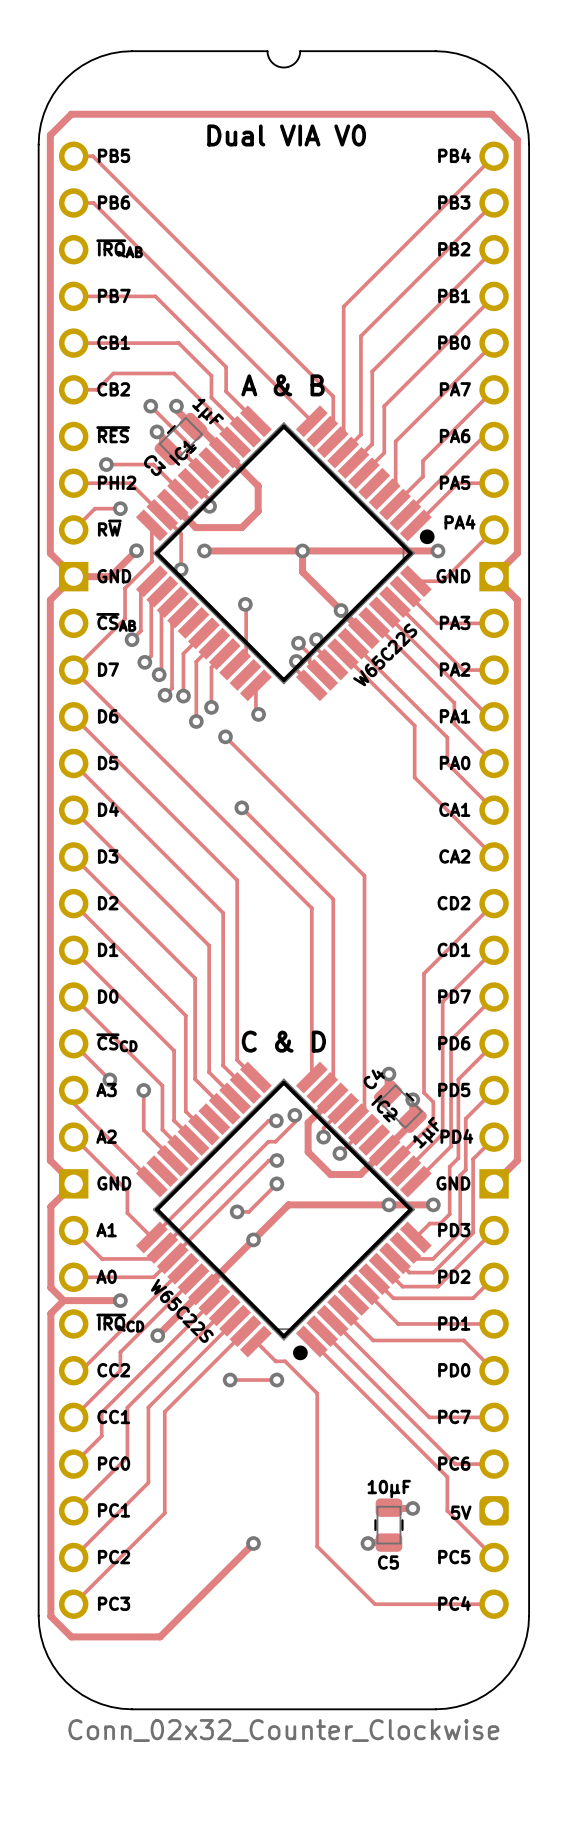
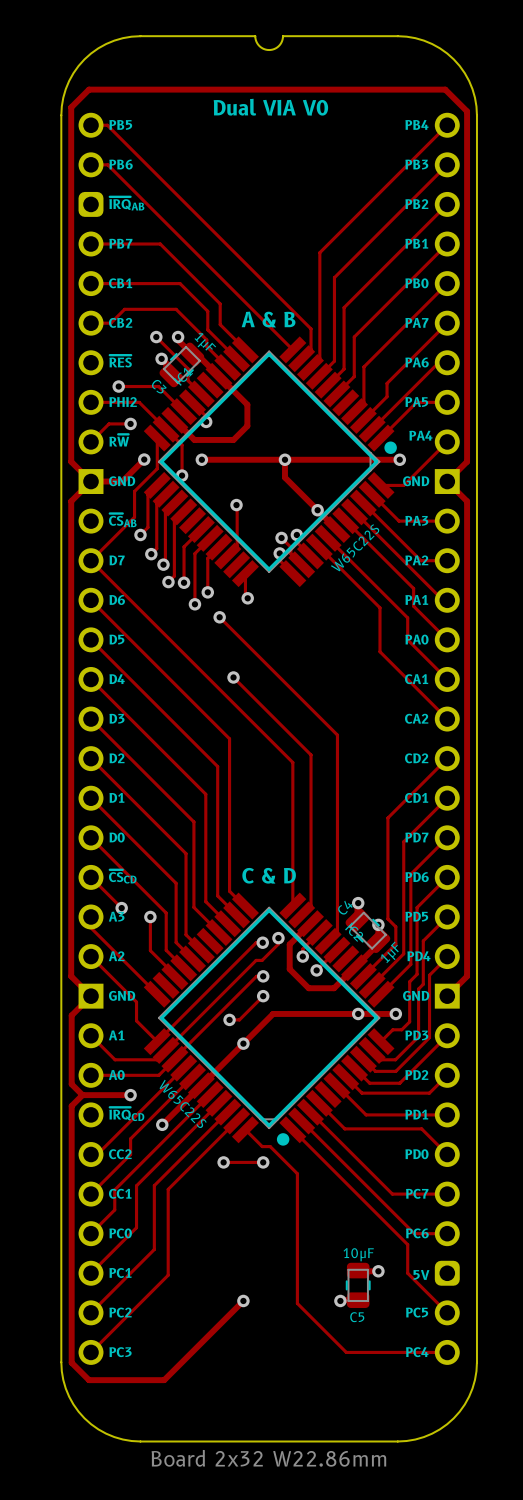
part footprint: [37, 50, 531, 1711] -> [60, 35, 478, 1443]
part value: Conn_02x32_Counter_Clockwise (283, 1730) -> Board 2x32 W22.86mm (268, 1458)

